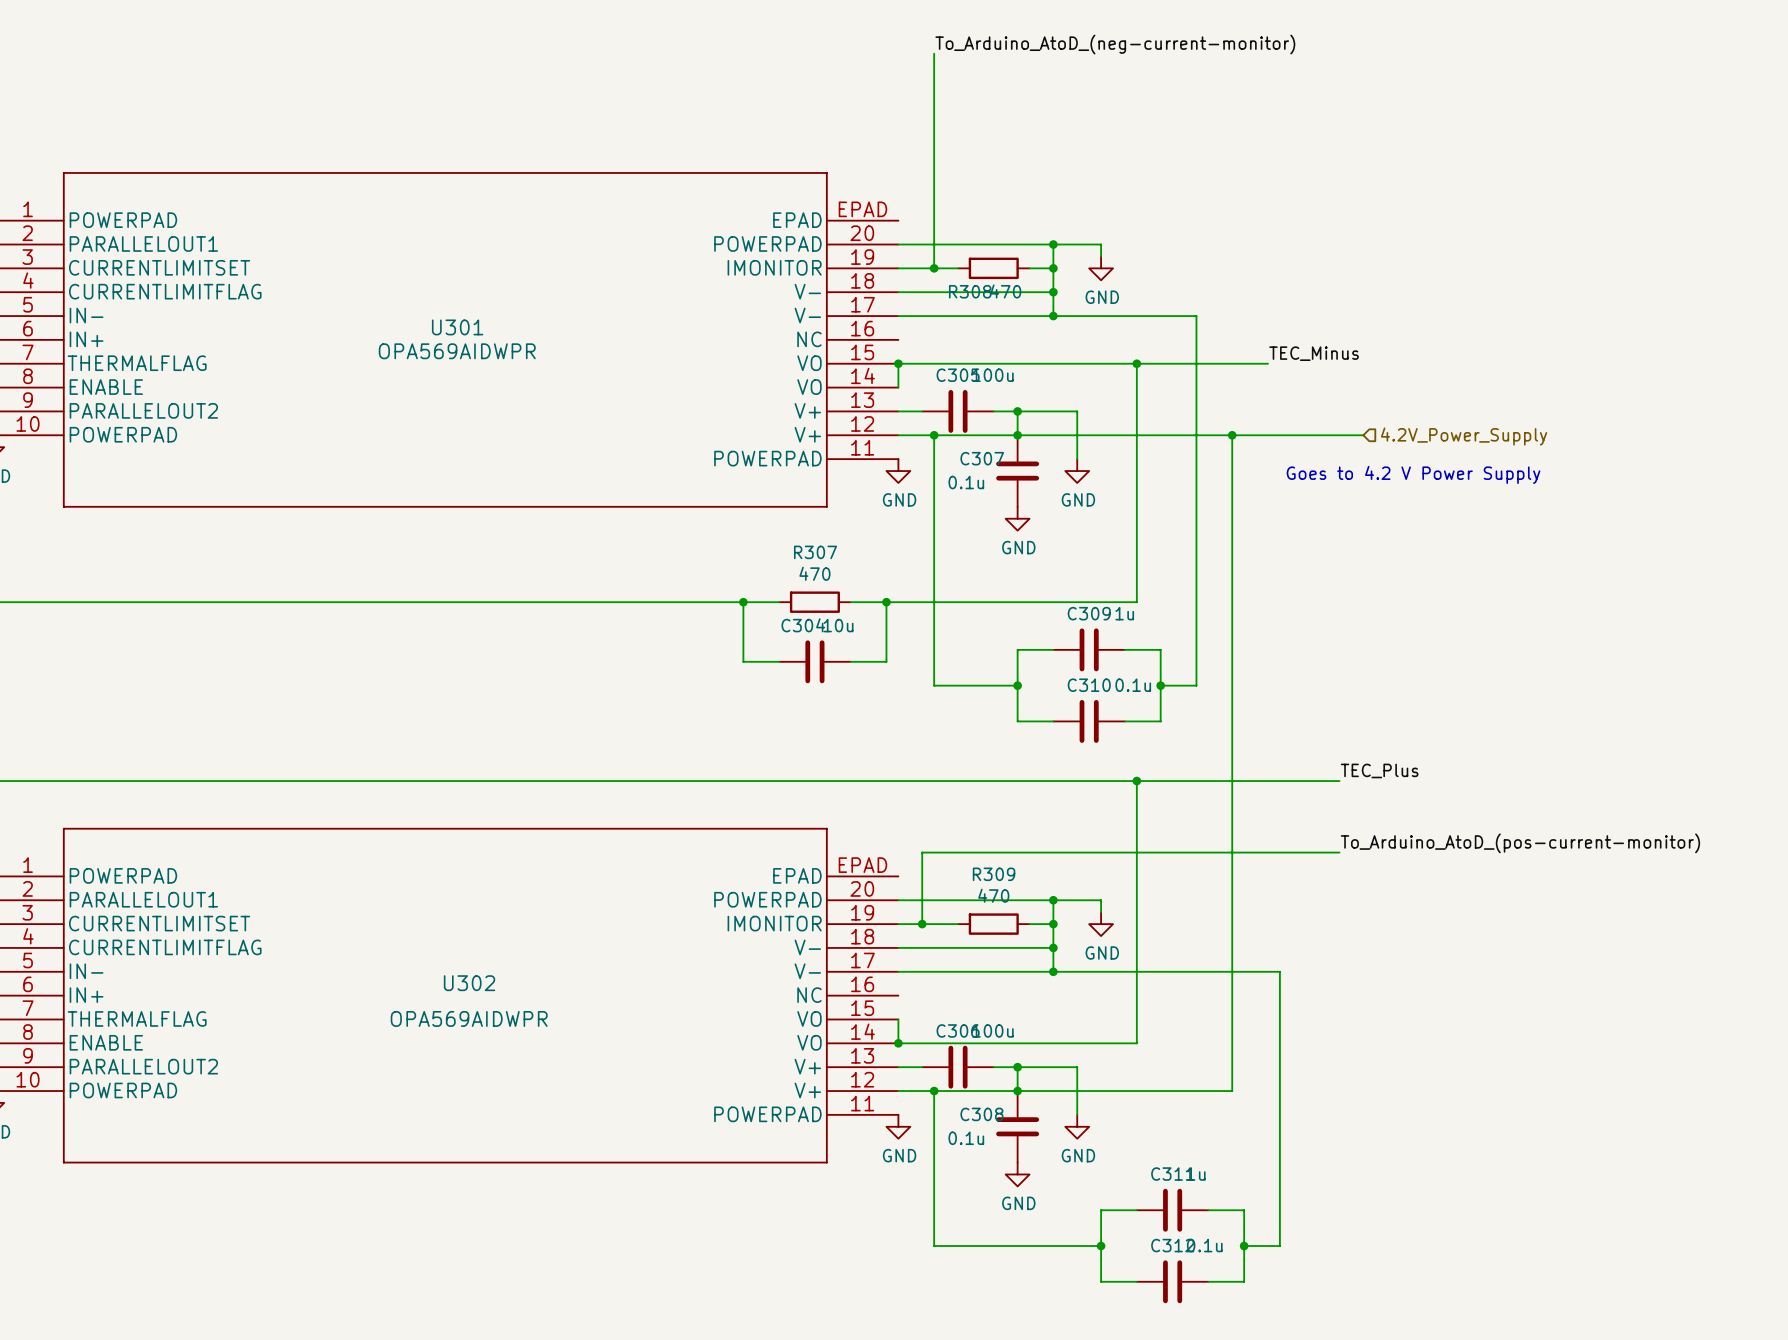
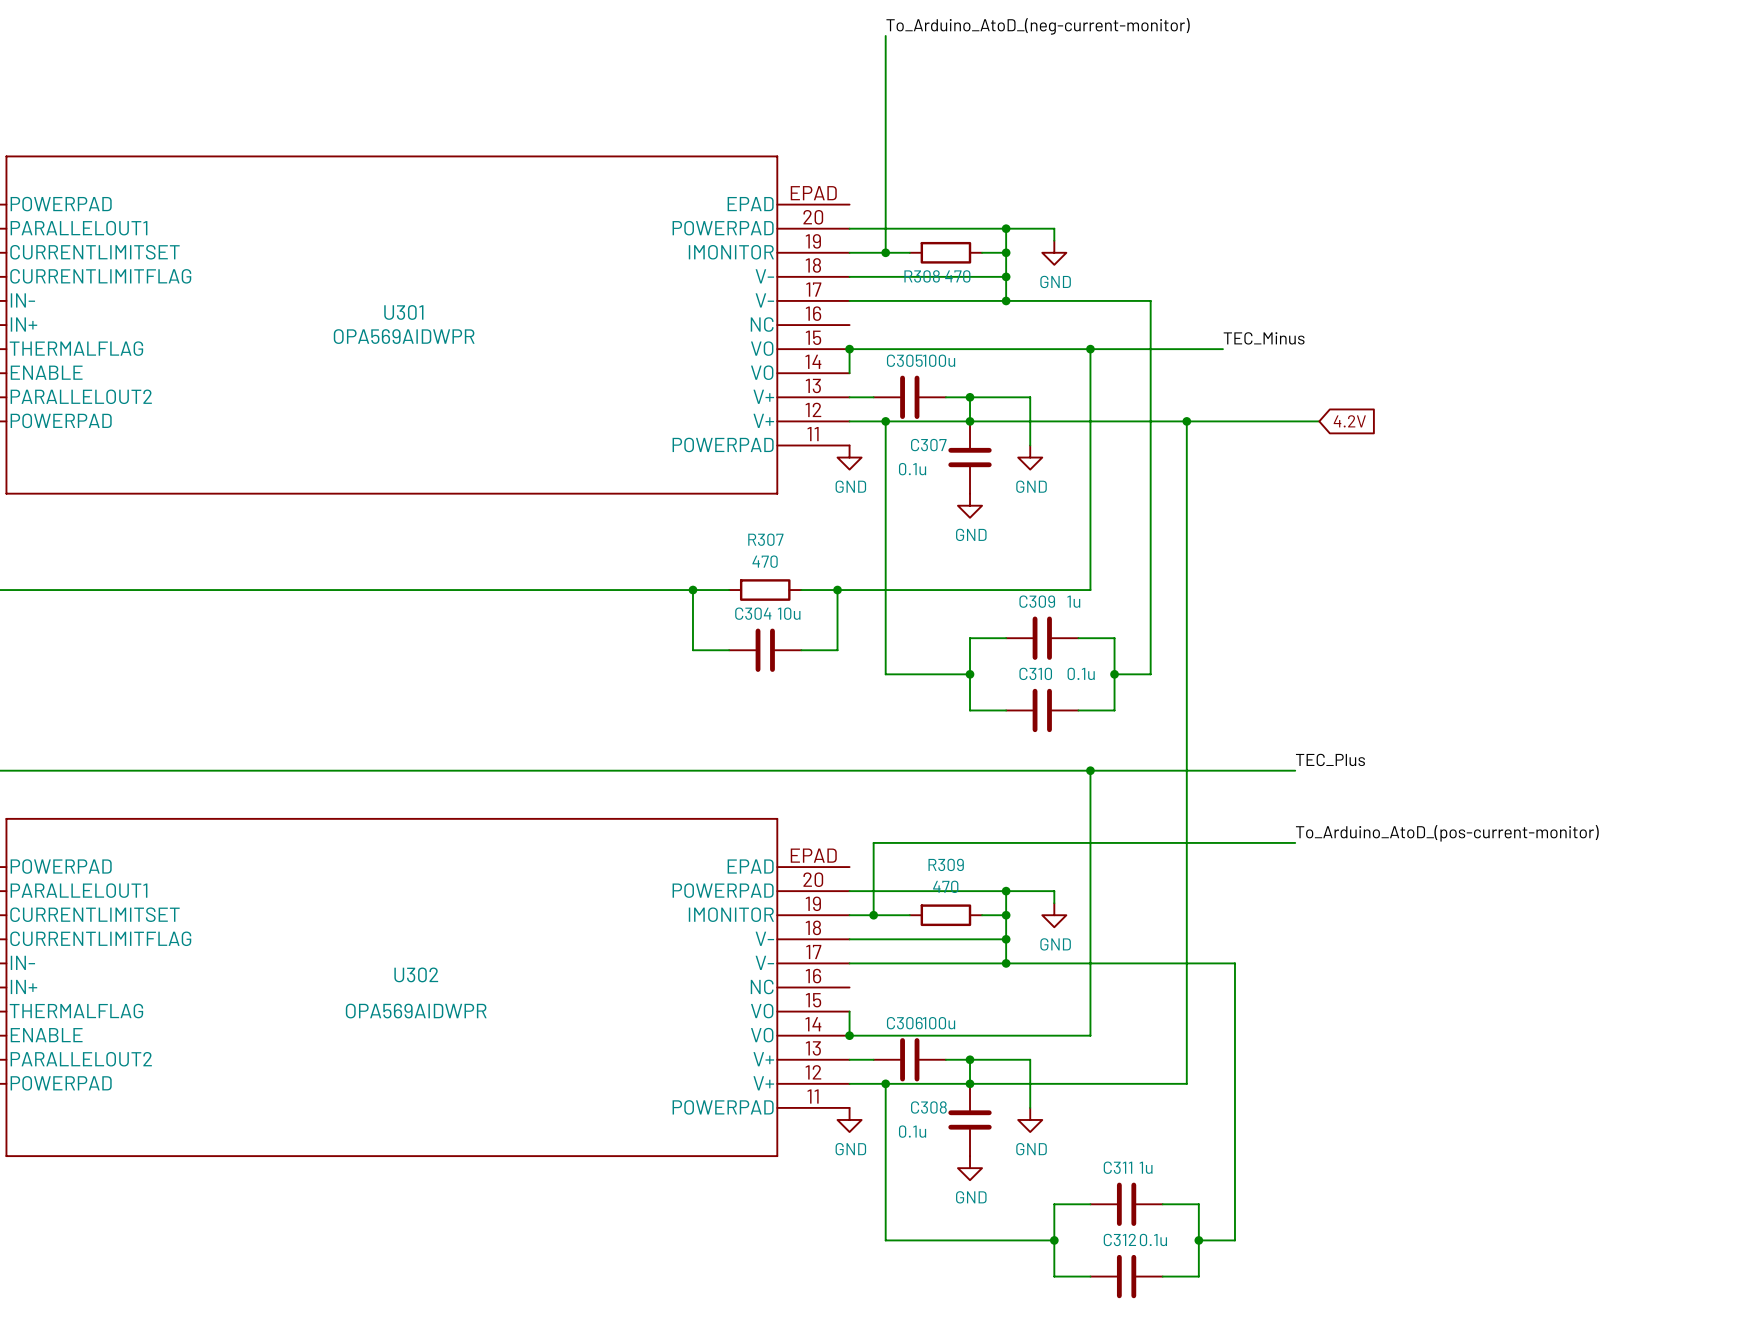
global label: none -> 4.2V (1349, 421)
hierarchical label: 4.2V_Power_Supply (1464, 436) -> none
text: Goes to 4.2 V Power Supply (1413, 474) -> none

